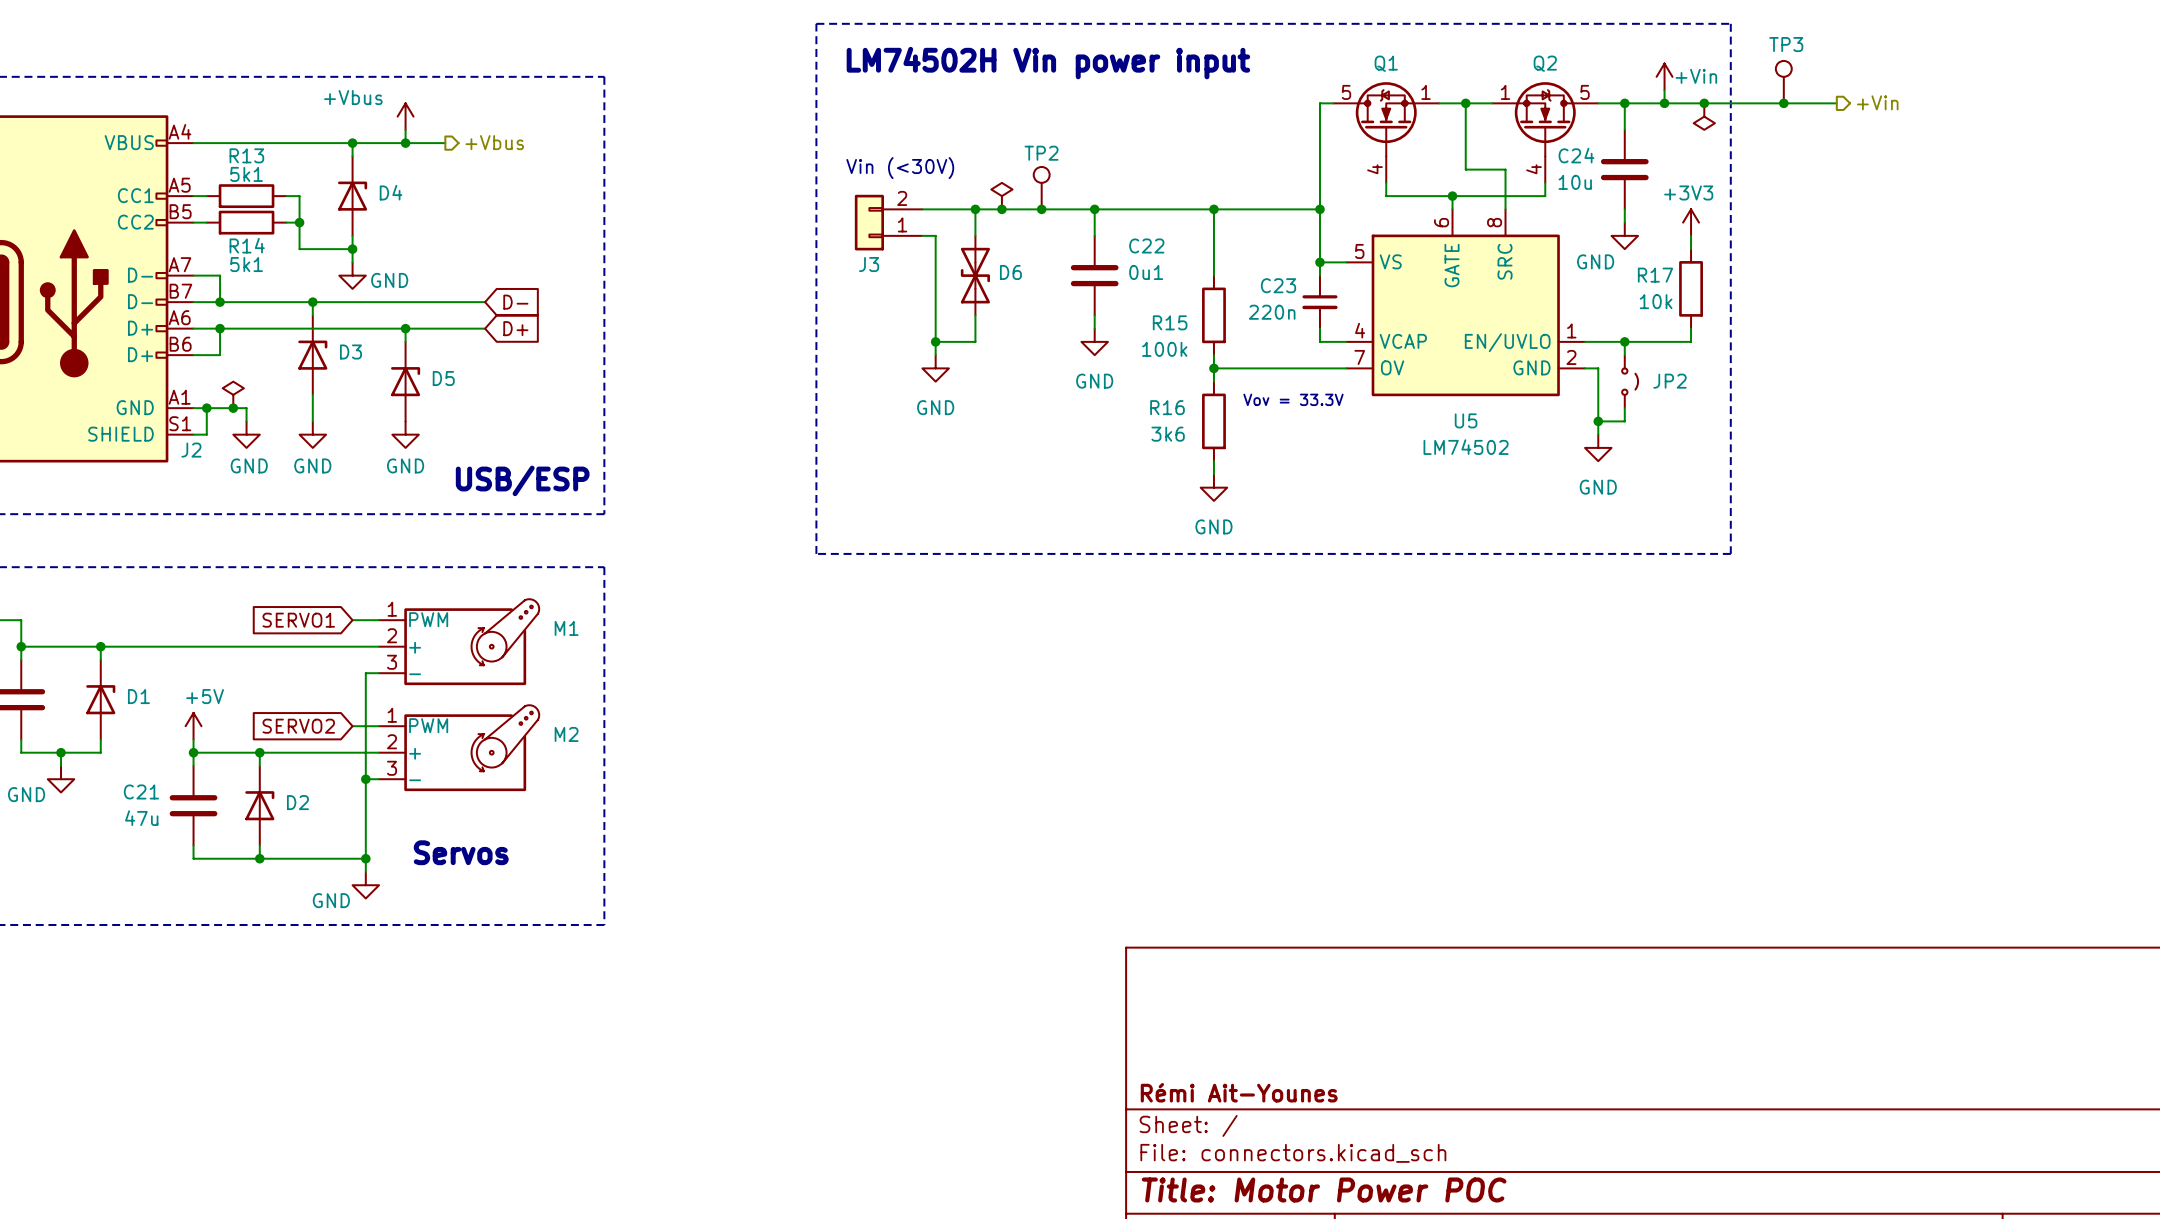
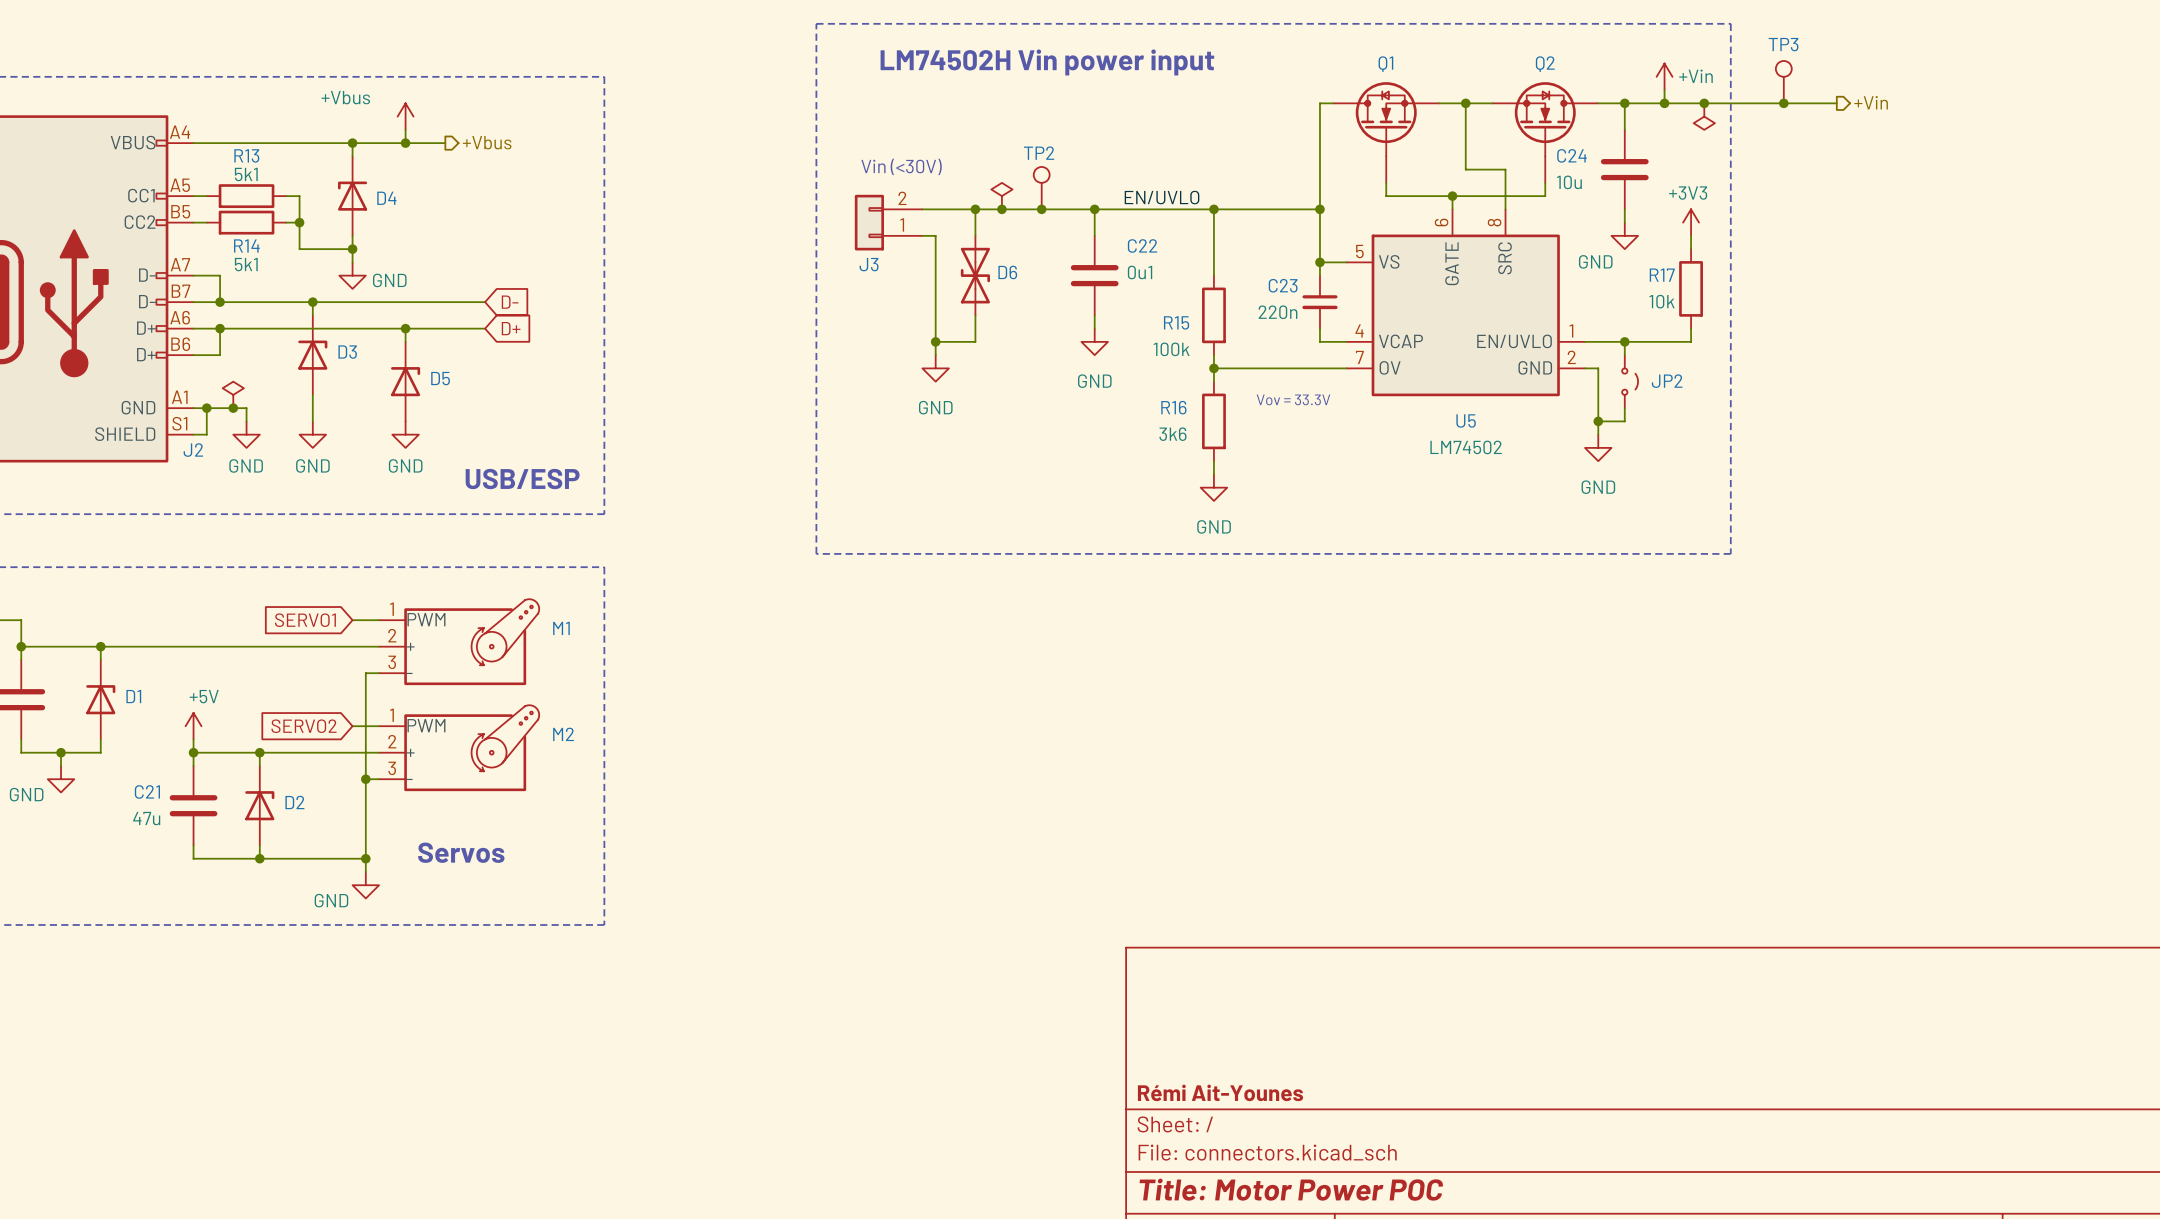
Q1 symbol: [1333, 82, 1440, 183] -> [1333, 82, 1440, 183]
Q2 symbol: [1492, 82, 1599, 183] -> [1492, 82, 1599, 183]
D4 flip: as is (352, 196) -> left-right (352, 196)
label: none -> EN/UVLO (1162, 197)

